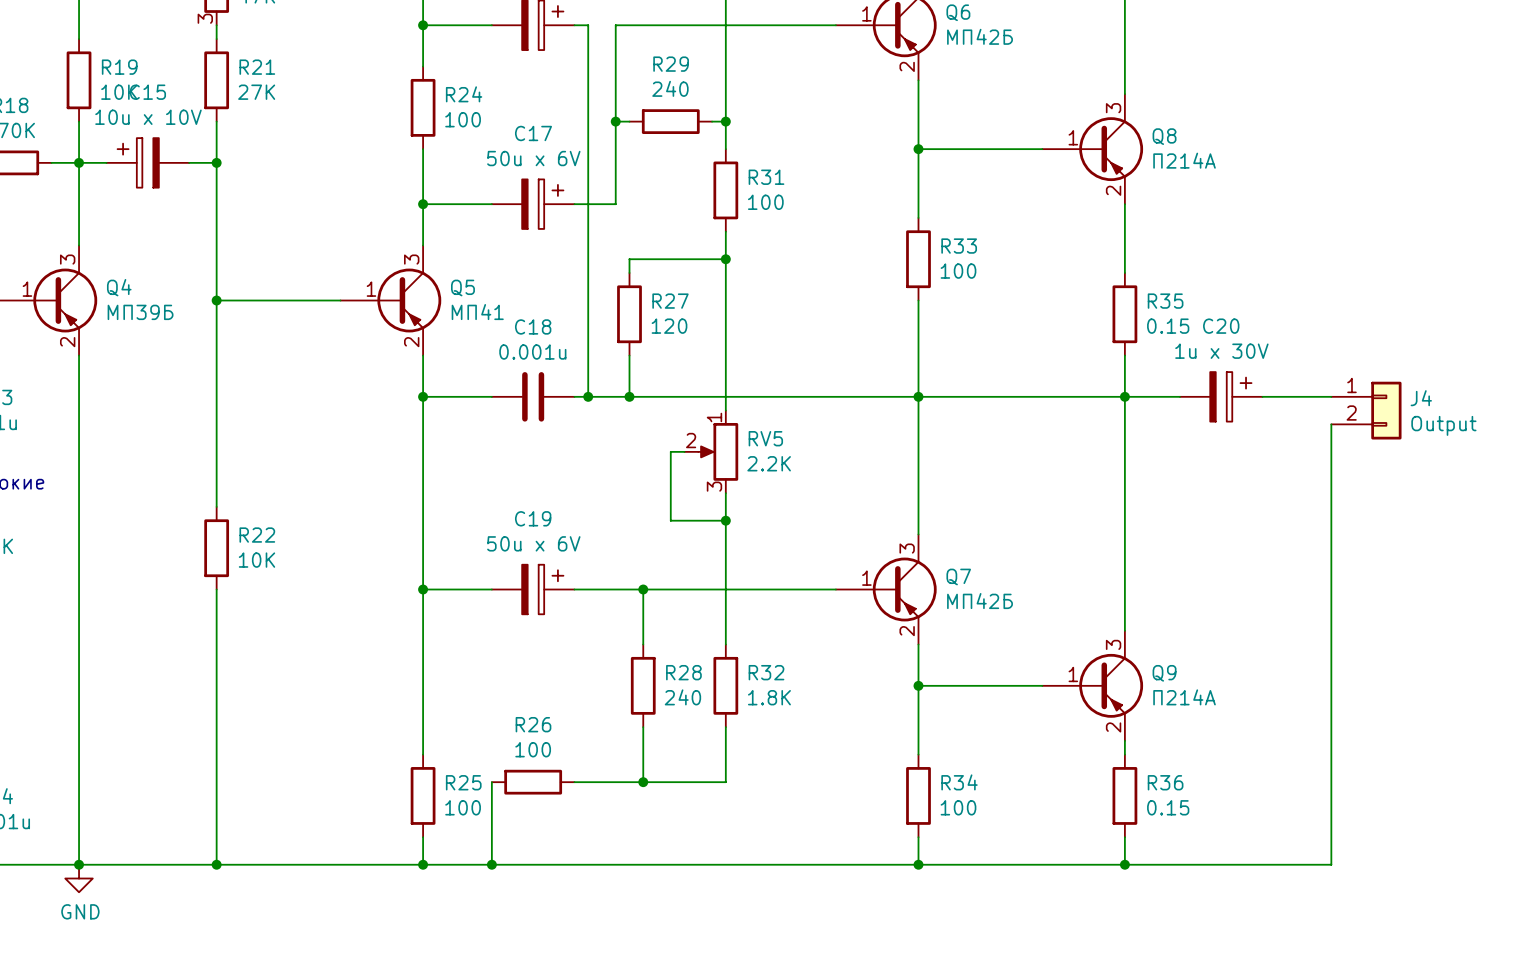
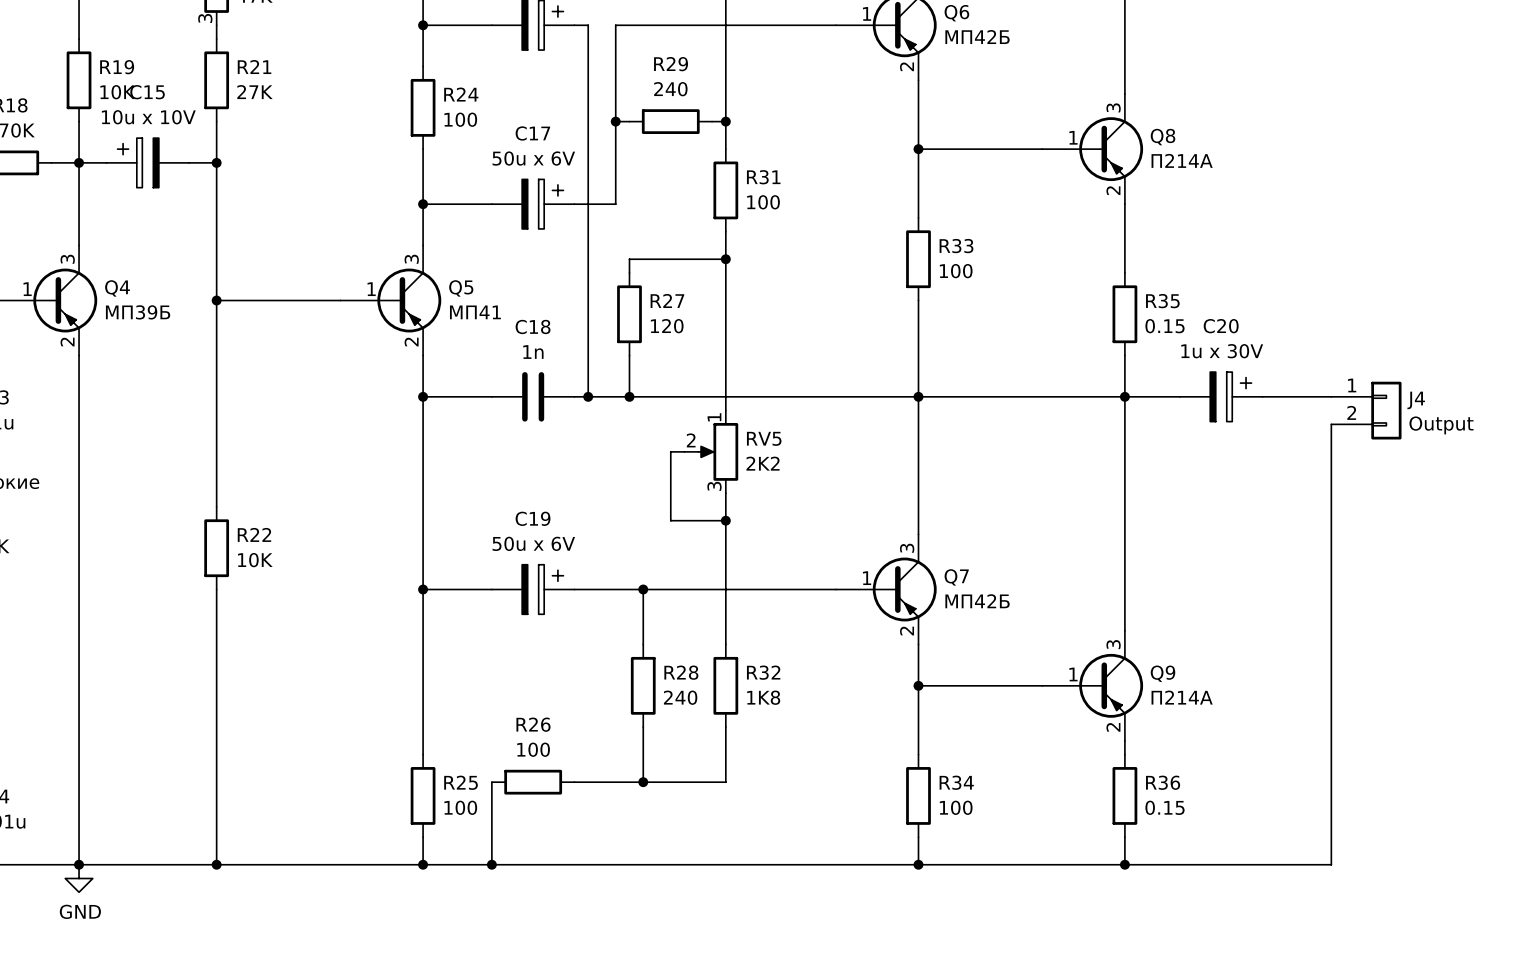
C18 value: 0.001u (532, 352) -> 1n (533, 352)
RV5 value: 2.2K (769, 463) -> 2K2 (763, 463)
R32 value: 1.8K (769, 697) -> 1K8 (763, 697)

